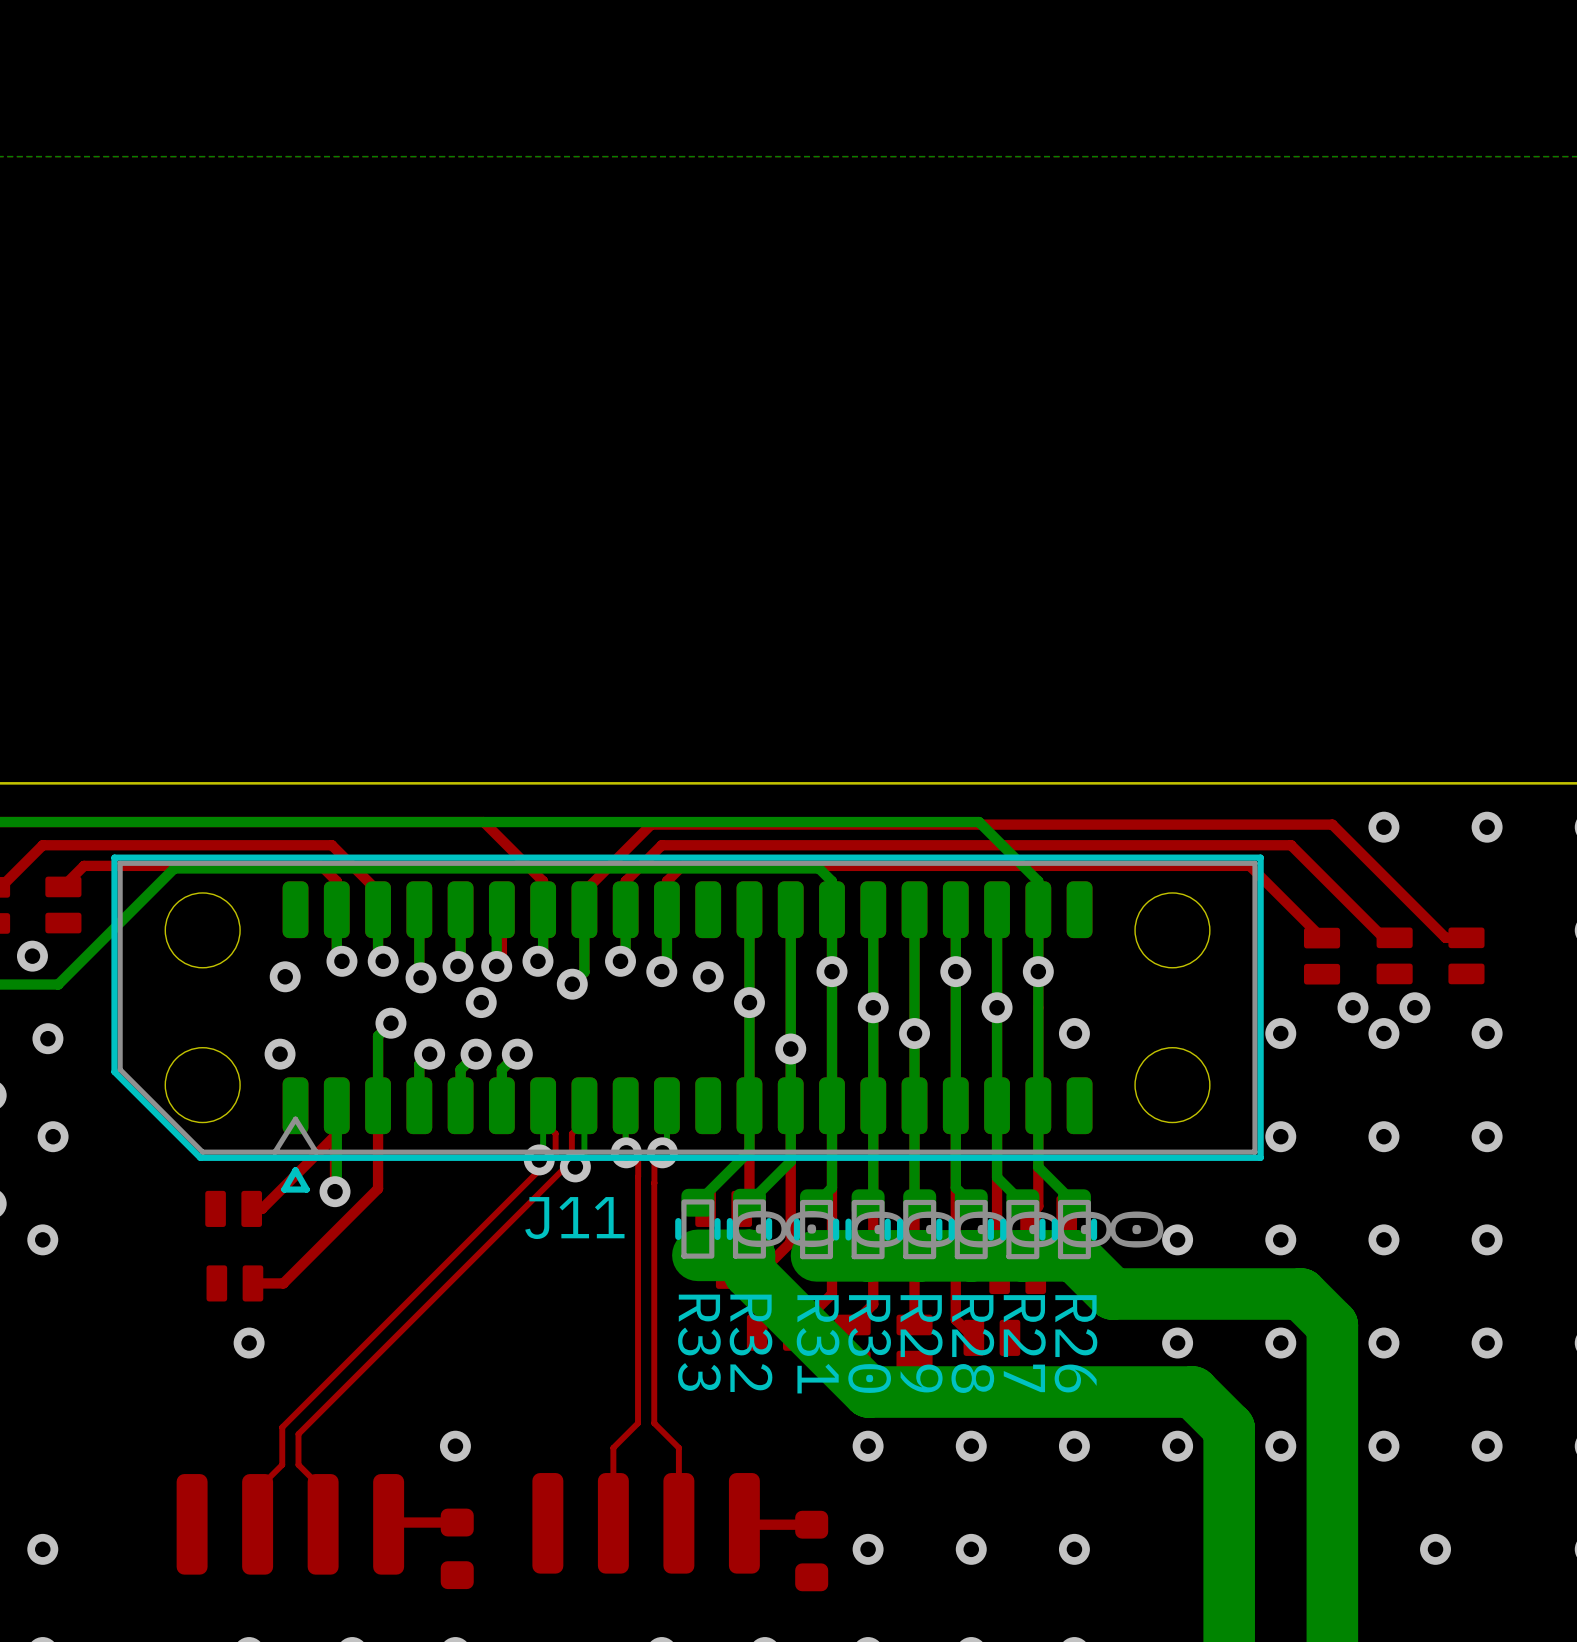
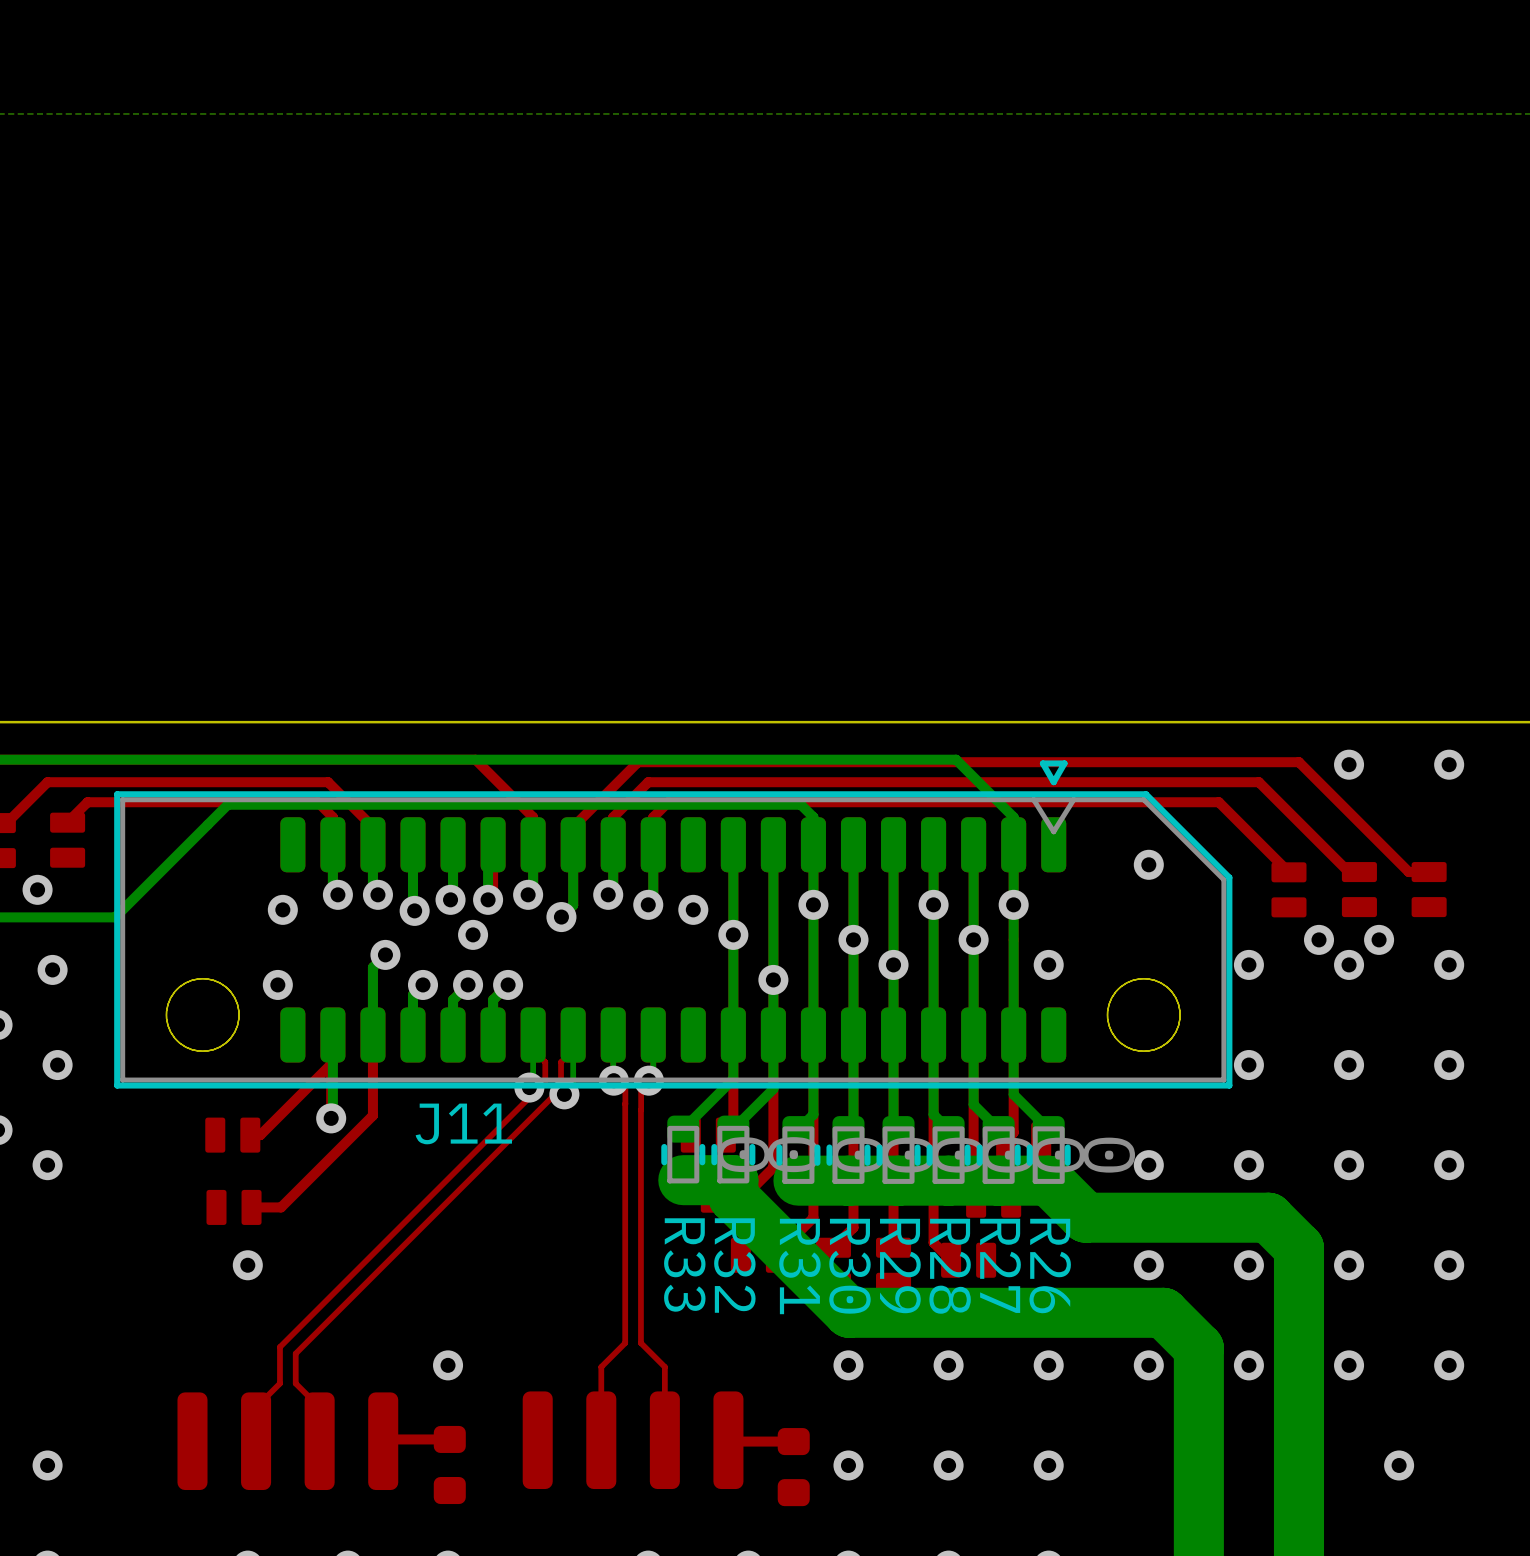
bottom track: (228, 868) (174, 868) (58, 984) -> (227, 804) (115, 917) (62, 917)
via: none -> (1148, 864)
J11 rotation: 0° (687, 1023) -> 180° (673, 924)
J11 name position: J11 (574, 1218) -> J11 (463, 1123)

